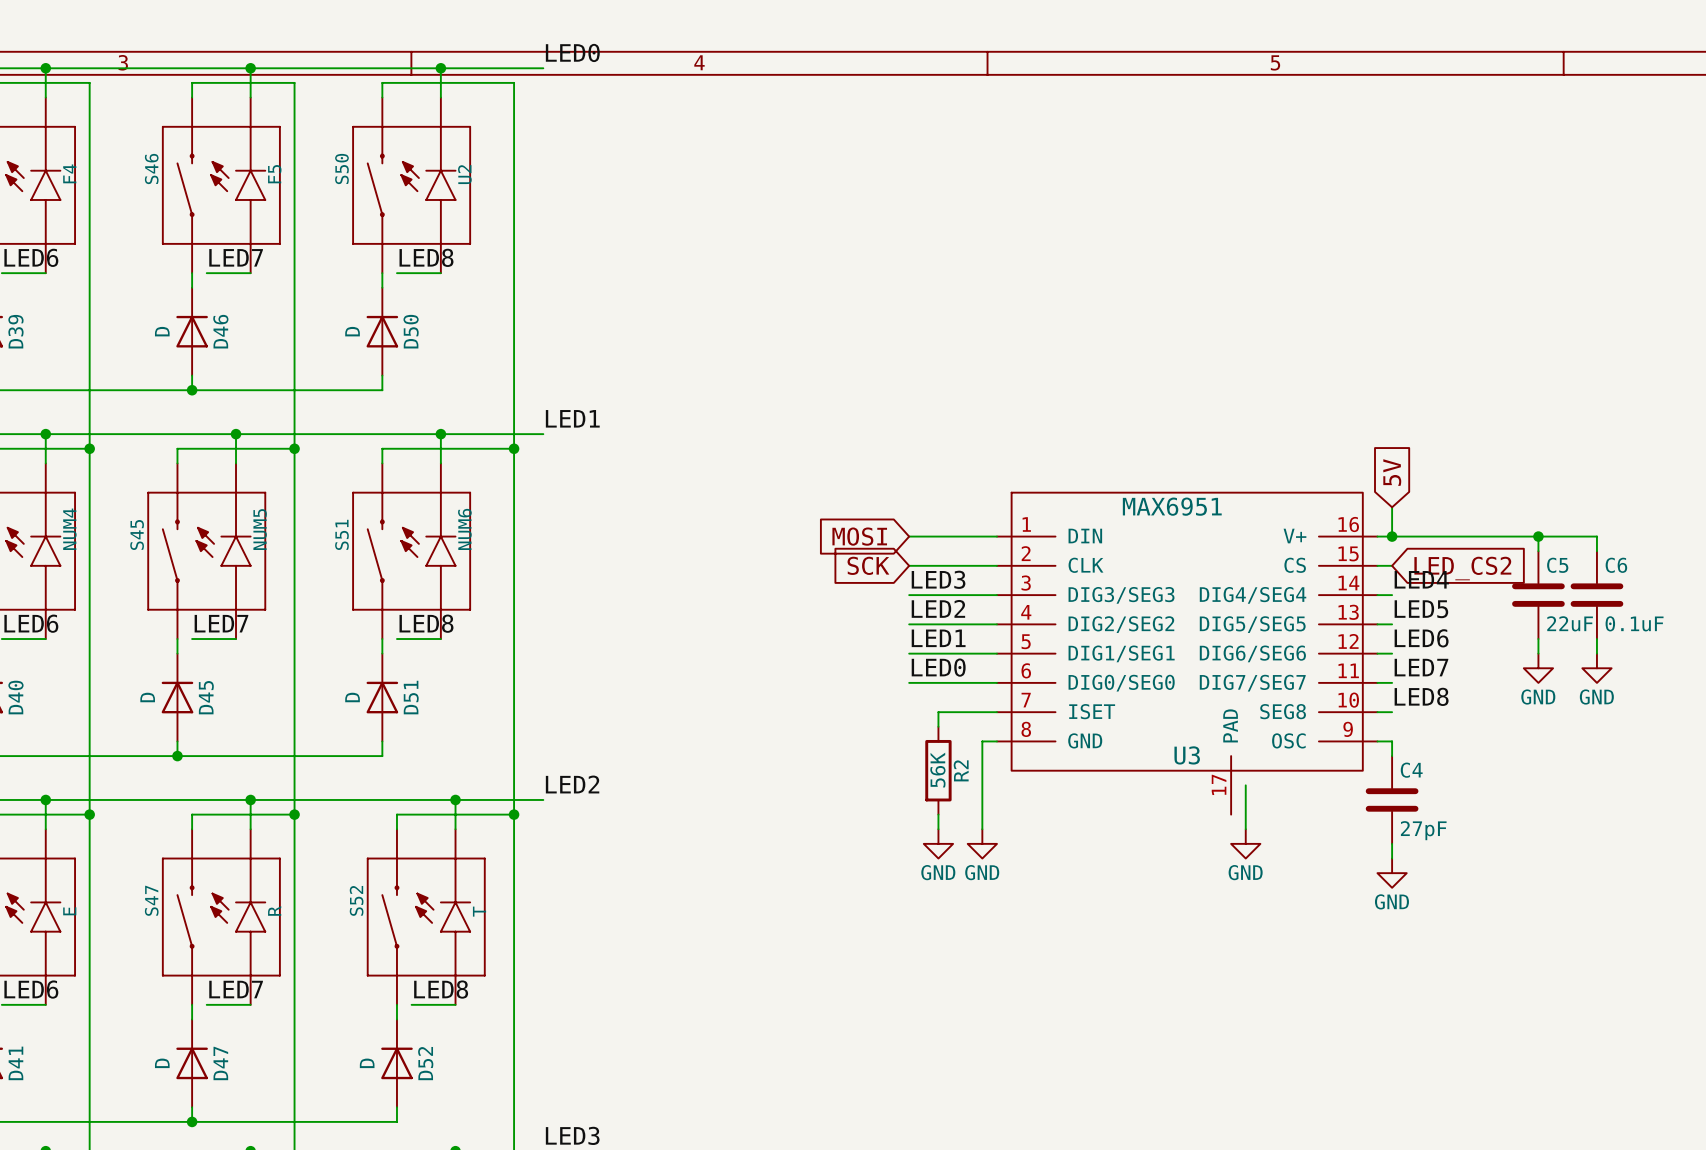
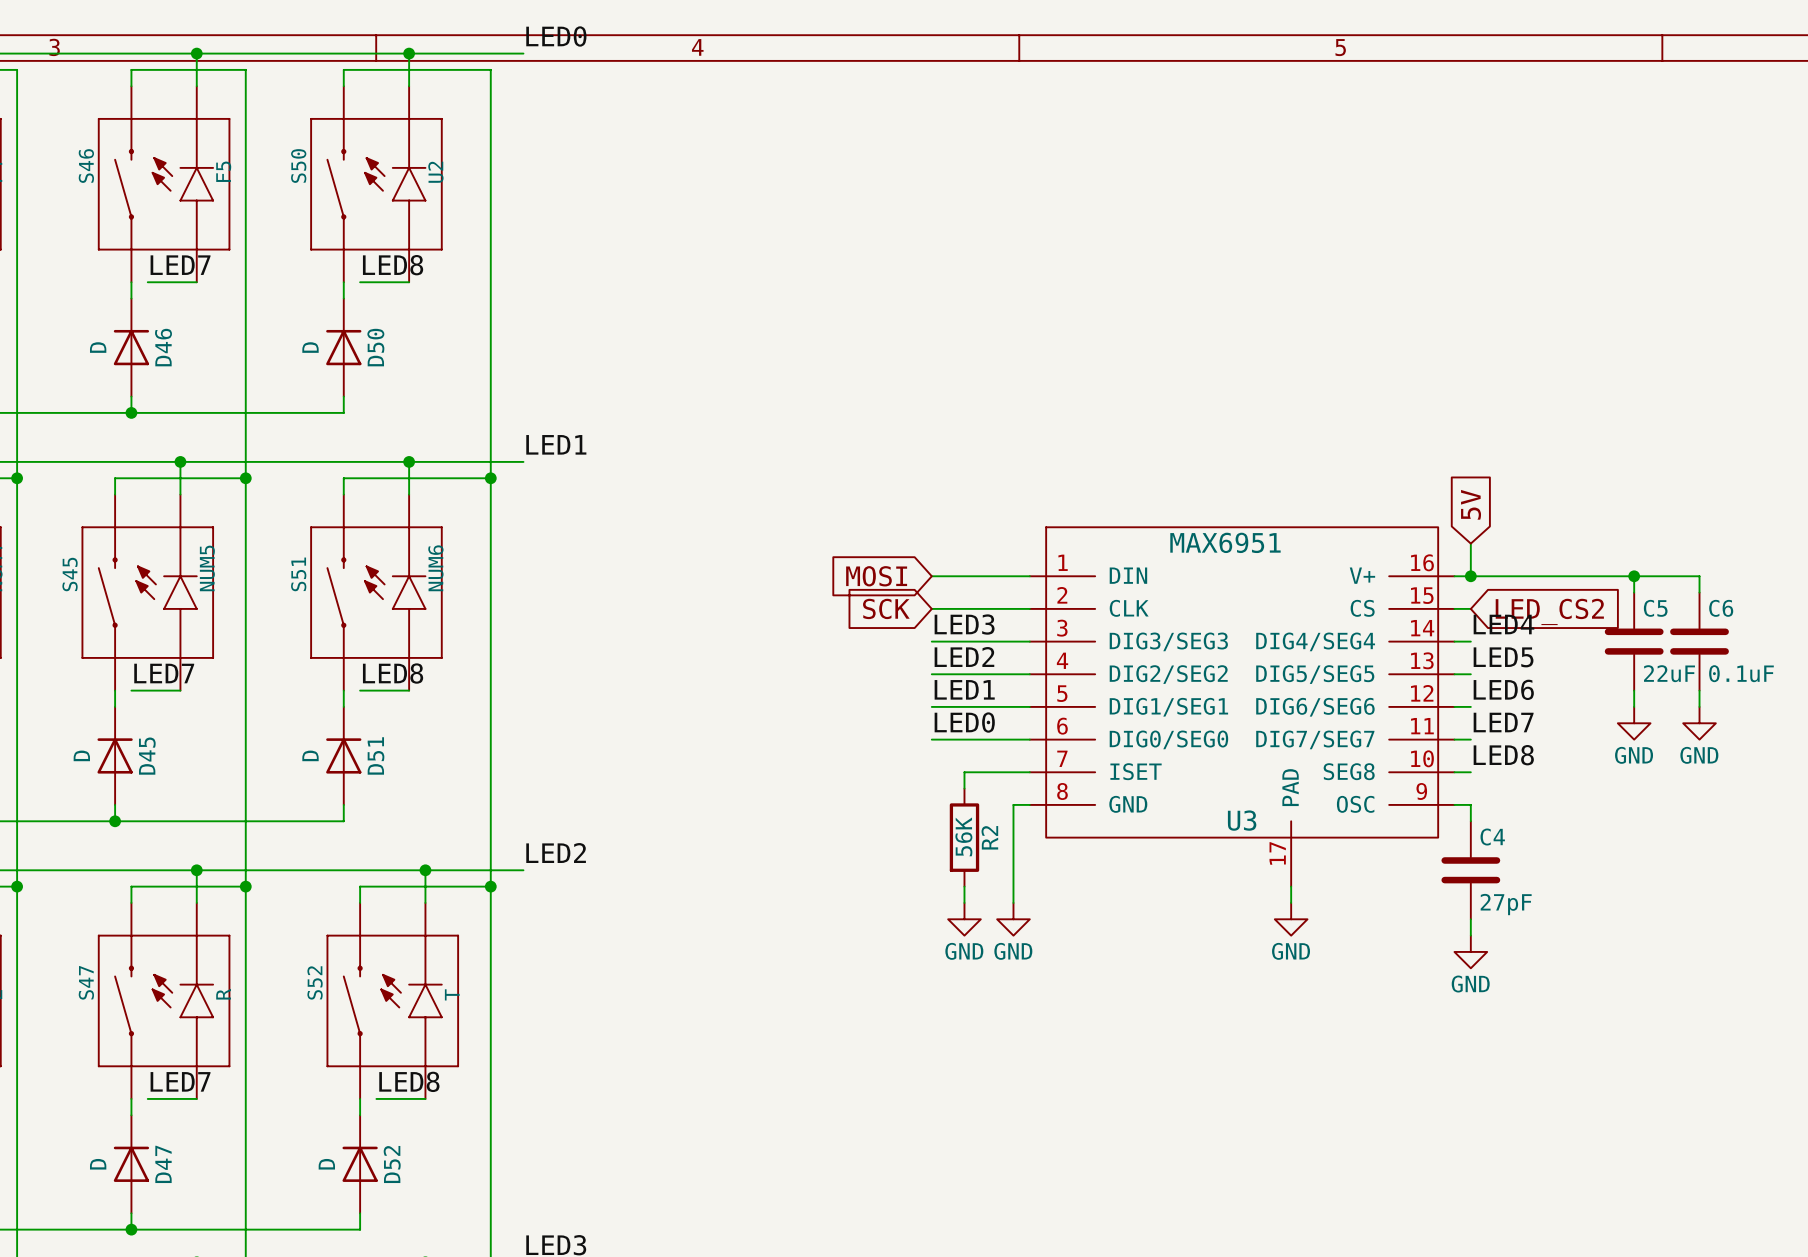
wire: (1245, 785) (1245, 829) -> none
wire: none -> (1291, 886) (1291, 902)
power symbol position: GND (1245, 843) -> GND (1291, 919)

